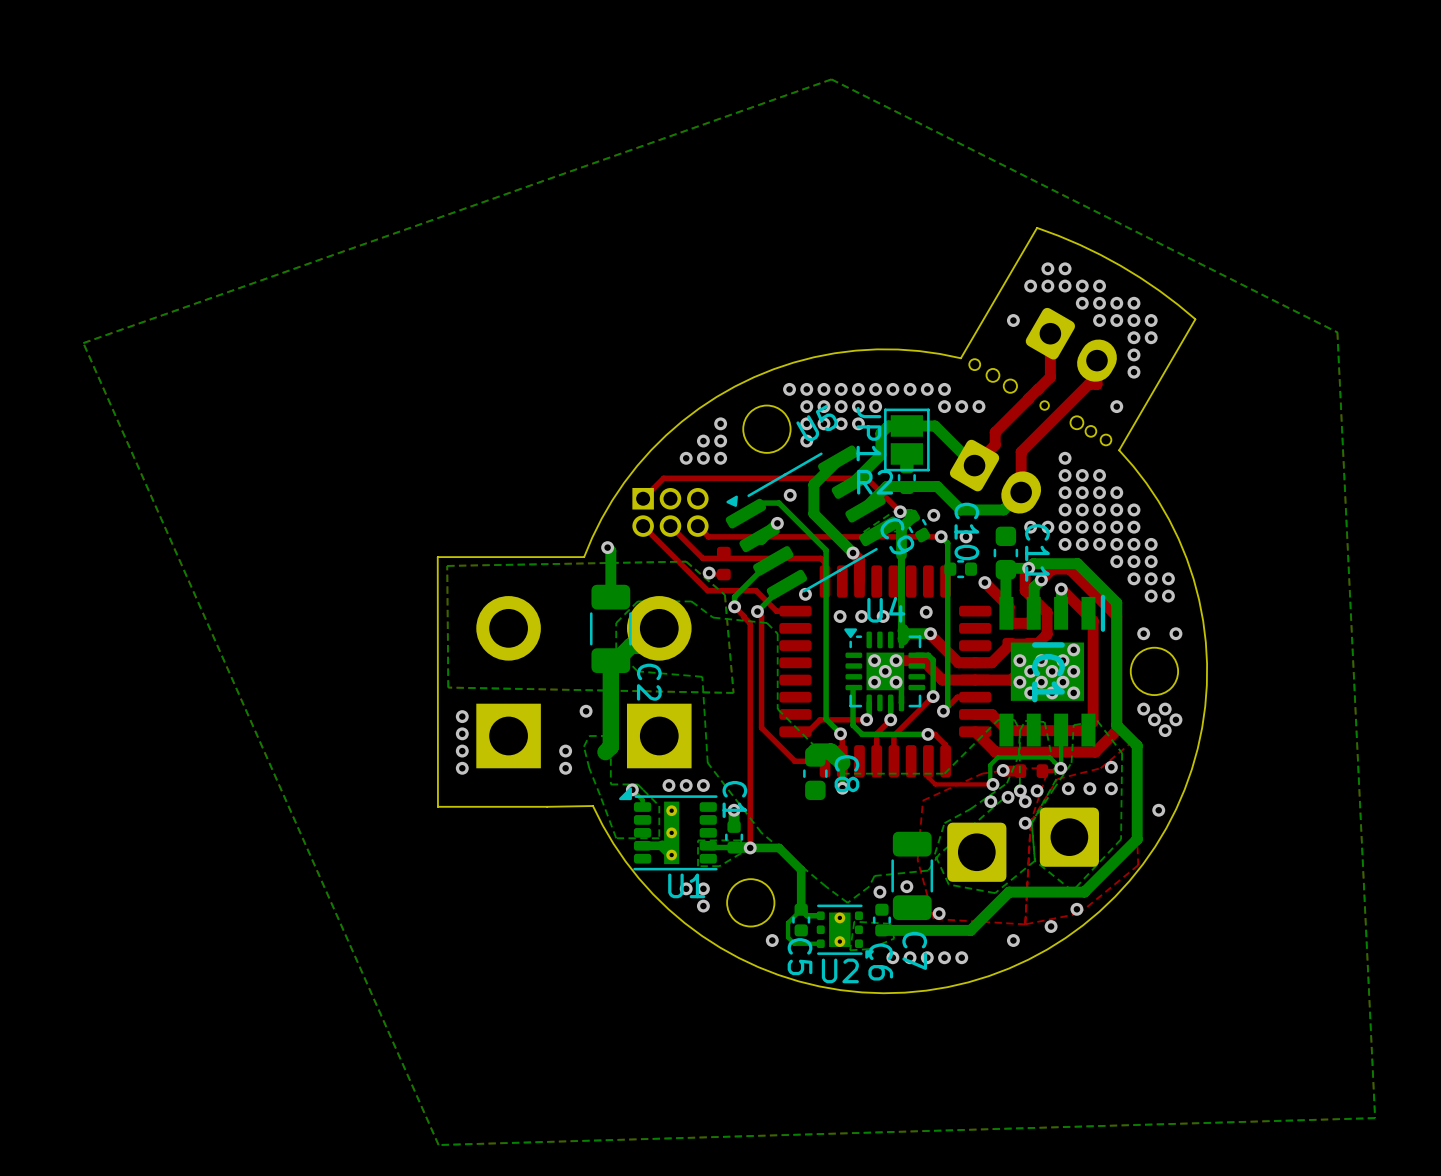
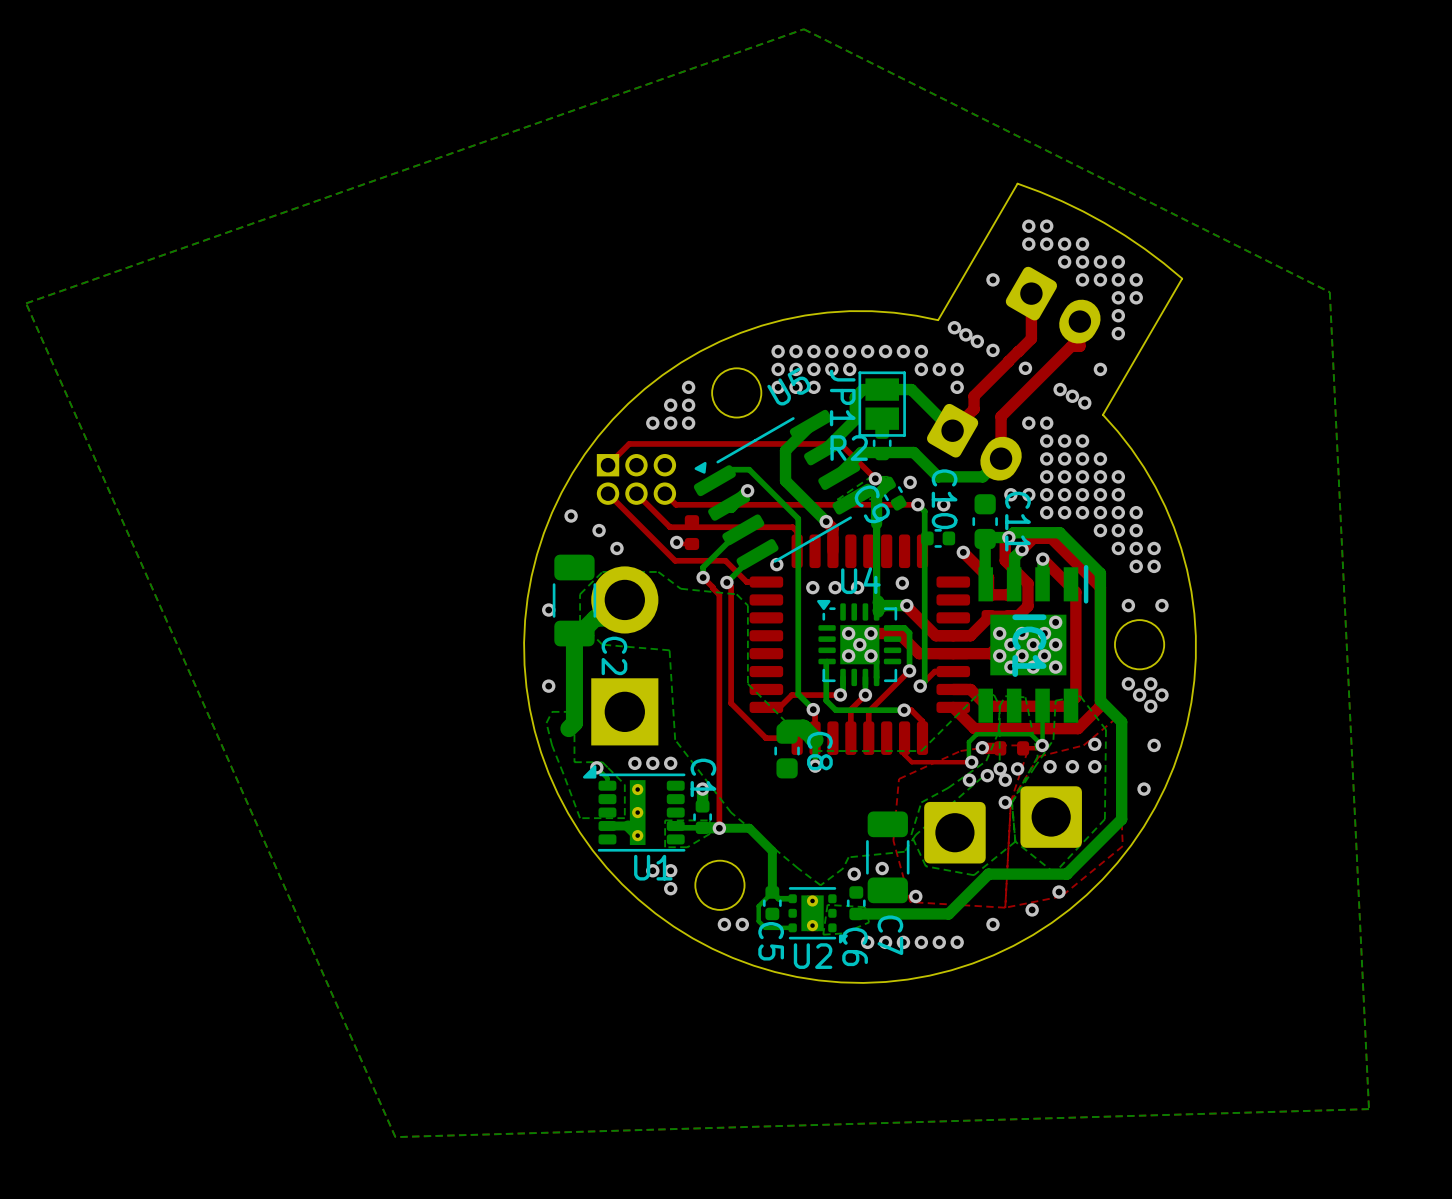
board edge: (1037, 227) (960, 358) (919, 351) (876, 349) (814, 357) (773, 369) (716, 396) (666, 435) (624, 482) (601, 518) (584, 557) (437, 557) (437, 806) (592, 806) (625, 861) (668, 909) (720, 947) (758, 967) (798, 981) (840, 990) (904, 992) (968, 982) (1028, 959) (1082, 925) (1114, 896) (1142, 864) (1166, 828) (1184, 789) (1202, 727) (1206, 685) (1205, 642) (1193, 579) (1169, 519) (1146, 483) (1119, 450) -> (1017, 183) (938, 320) (894, 312) (849, 311) (805, 315) (740, 332) (680, 362) (644, 388) (598, 436) (572, 473) (543, 533) (531, 576) (525, 620) (526, 687) (534, 730) (557, 793) (579, 832) (622, 884) (673, 926) (732, 957) (796, 976) (863, 982) (907, 979) (972, 963) (1033, 934) (1086, 895) (1131, 845) (1165, 787) (1186, 724) (1195, 658) (1191, 591) (1173, 527) (1144, 467) (1102, 414)
via: (1030, 286) -> none
round board edge: [968, 358, 981, 371] -> none
via: none -> (954, 327)
round board edge: [985, 368, 1000, 383] -> none
via: none -> (965, 334)
round board edge: [1003, 378, 1018, 394] -> none
via: none -> (977, 341)
via: none -> (992, 350)
via: (789, 389) -> none
round board edge: [1039, 400, 1050, 411] -> none
via: none -> (1025, 368)
round board edge: [1069, 415, 1084, 430] -> none
via: (858, 423) -> none
via: none -> (957, 387)
via: none -> (1060, 389)
round board edge: [1085, 425, 1097, 438] -> none
via: none -> (1072, 396)
round board edge: [1100, 434, 1112, 446] -> none
via: none -> (1084, 403)
via: (806, 441) -> none
via: none -> (1028, 423)
via: (790, 495) -> none
bottom track: (607, 547) (610, 550) (610, 597) -> none
via: none -> (599, 530)
bottom zone outline: (686, 561) (447, 565) (448, 687) (733, 692) (724, 594) (686, 561) -> none
via: none -> (616, 548)
via: none -> (548, 610)
part: (508, 682) -> none
via: (462, 716) -> none
via: (462, 733) -> none
via: (462, 751) -> none
via: (565, 751) -> none
via: (462, 768) -> none
via: (565, 768) -> none
via: none -> (1154, 745)
via: none -> (724, 924)
via: none -> (957, 942)

